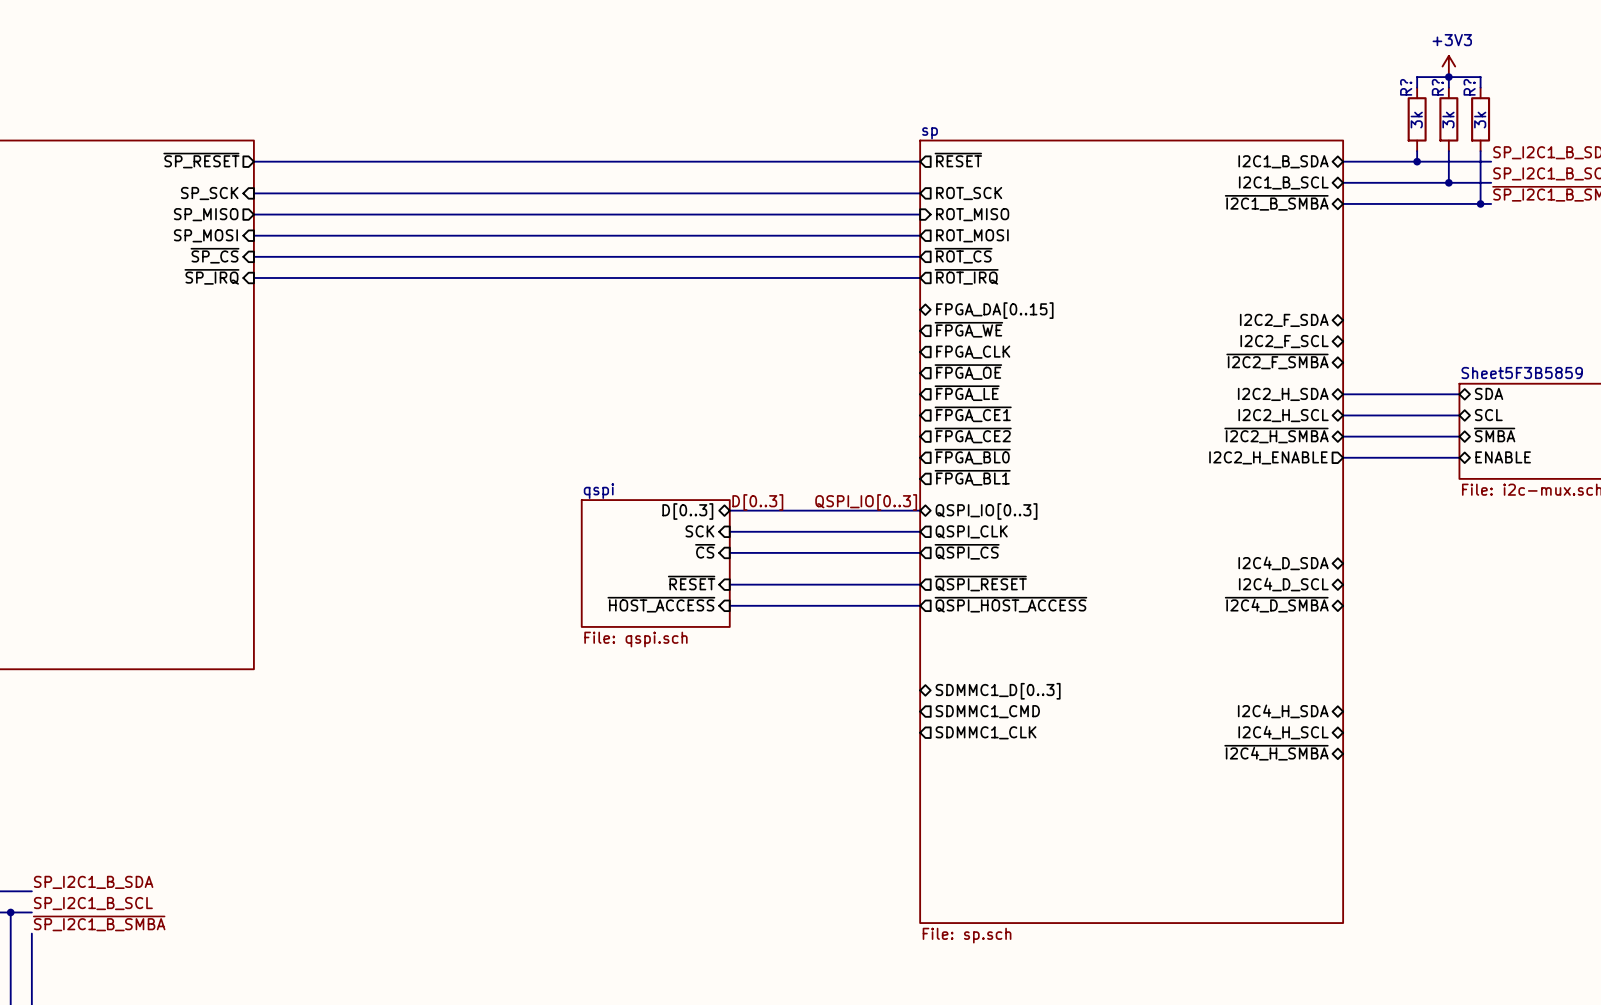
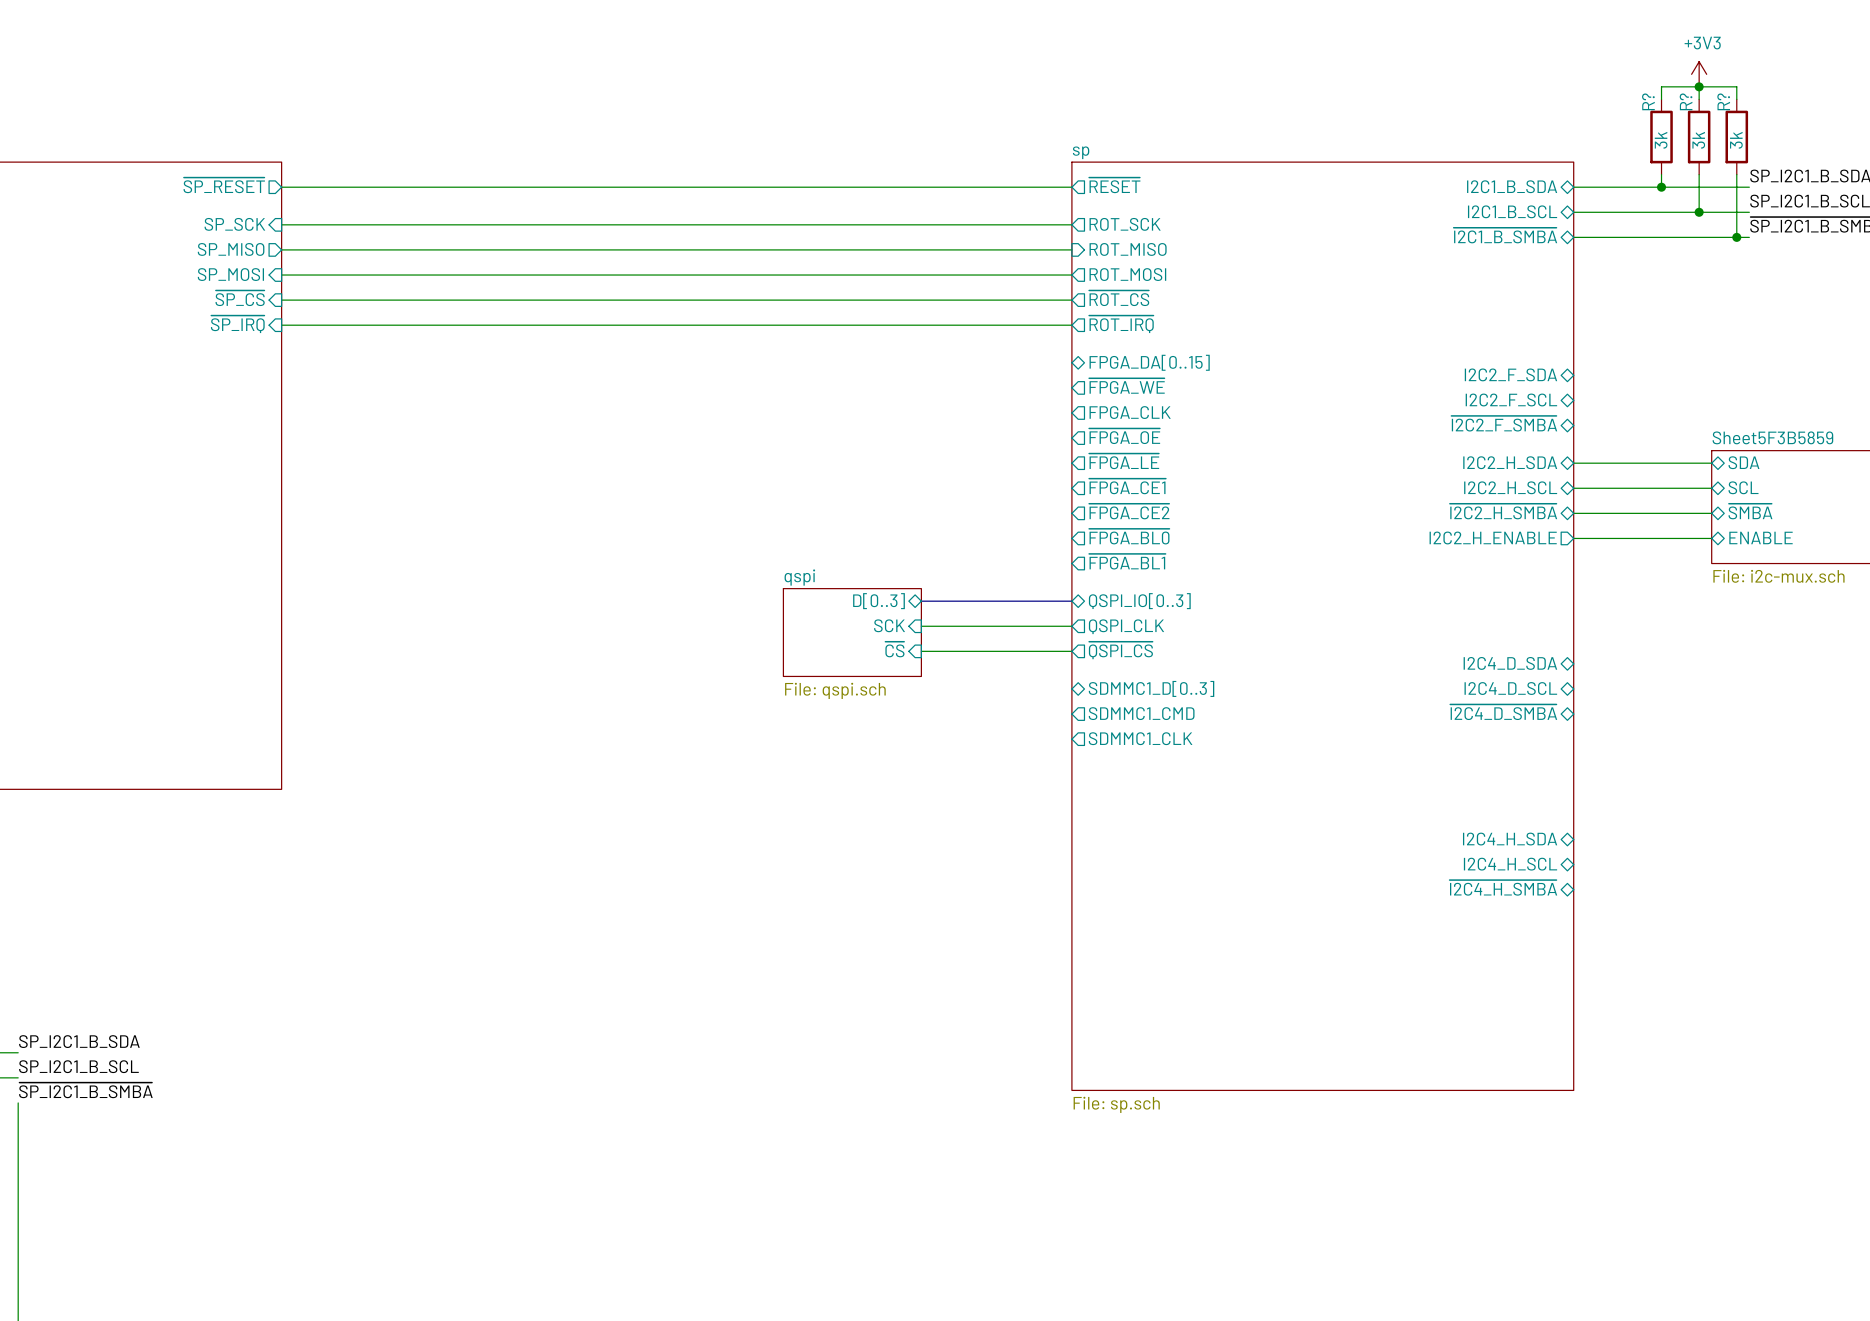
label: D[0..3] (757, 502) -> none
label: QSPI_IO[0..3] (866, 502) -> none
bus: (729, 510) (793, 510) -> none
sheet pin position: D[0..3] (687, 511) -> D[0..3] (879, 601)
sheet pin position: SCK (699, 531) -> SCK (889, 625)
wire: (729, 531) (793, 531) -> none
sheet qspi: none -> File: qspi.sch (852, 632)
sheet pin position: ~{CS} (705, 551) -> ~{CS} (894, 649)
wire: (729, 552) (793, 552) -> none
sheet qspi: File: qspi.sch (655, 563) -> none
sheet pin: ~{RESET} (691, 583) -> none
sheet pin shape: output (980, 583) -> bidirectional (1151, 688)
sheet pin: ~{QSPI_RESET} (980, 583) -> SDMMC1_D[0..3] (1151, 688)
wire: (729, 584) (920, 584) -> none
sheet pin: ~{HOST_ACCESS} (661, 604) -> none
sheet pin: ~{QSPI_HOST_ACCESS} (1010, 604) -> SDMMC1_CMD (1141, 713)
wire: (729, 605) (920, 605) -> none
sheet pin: SDMMC1_D[0..3] (998, 691) -> none
sheet pin: SDMMC1_CMD (987, 711) -> none
sheet pin position: SDMMC1_CLK (986, 732) -> SDMMC1_CLK (1140, 738)

